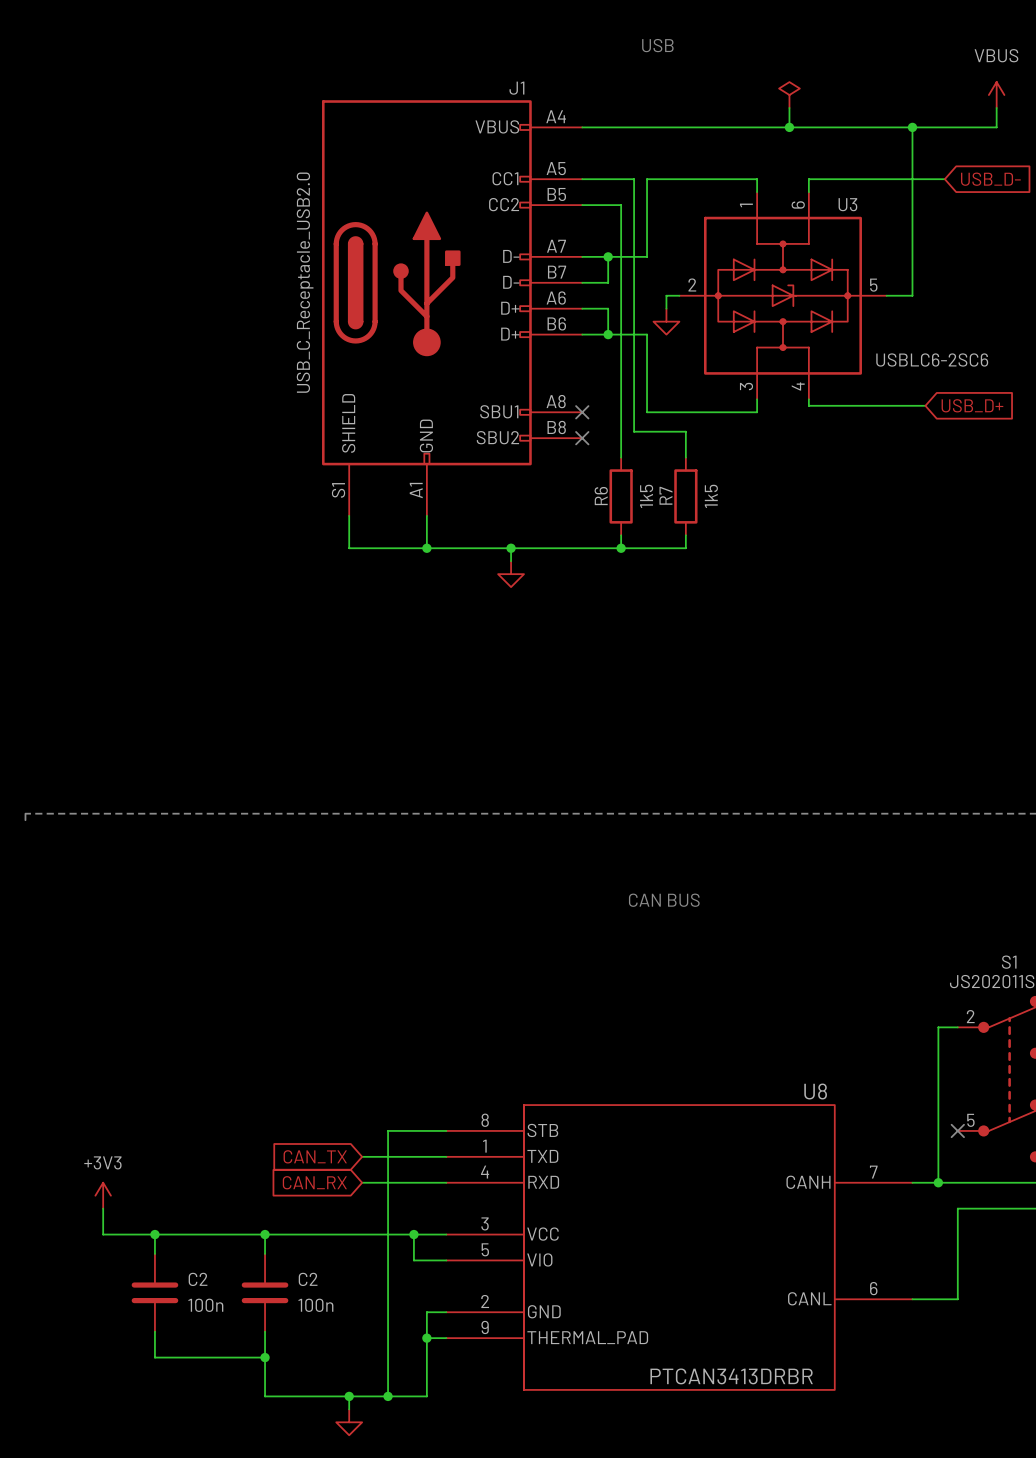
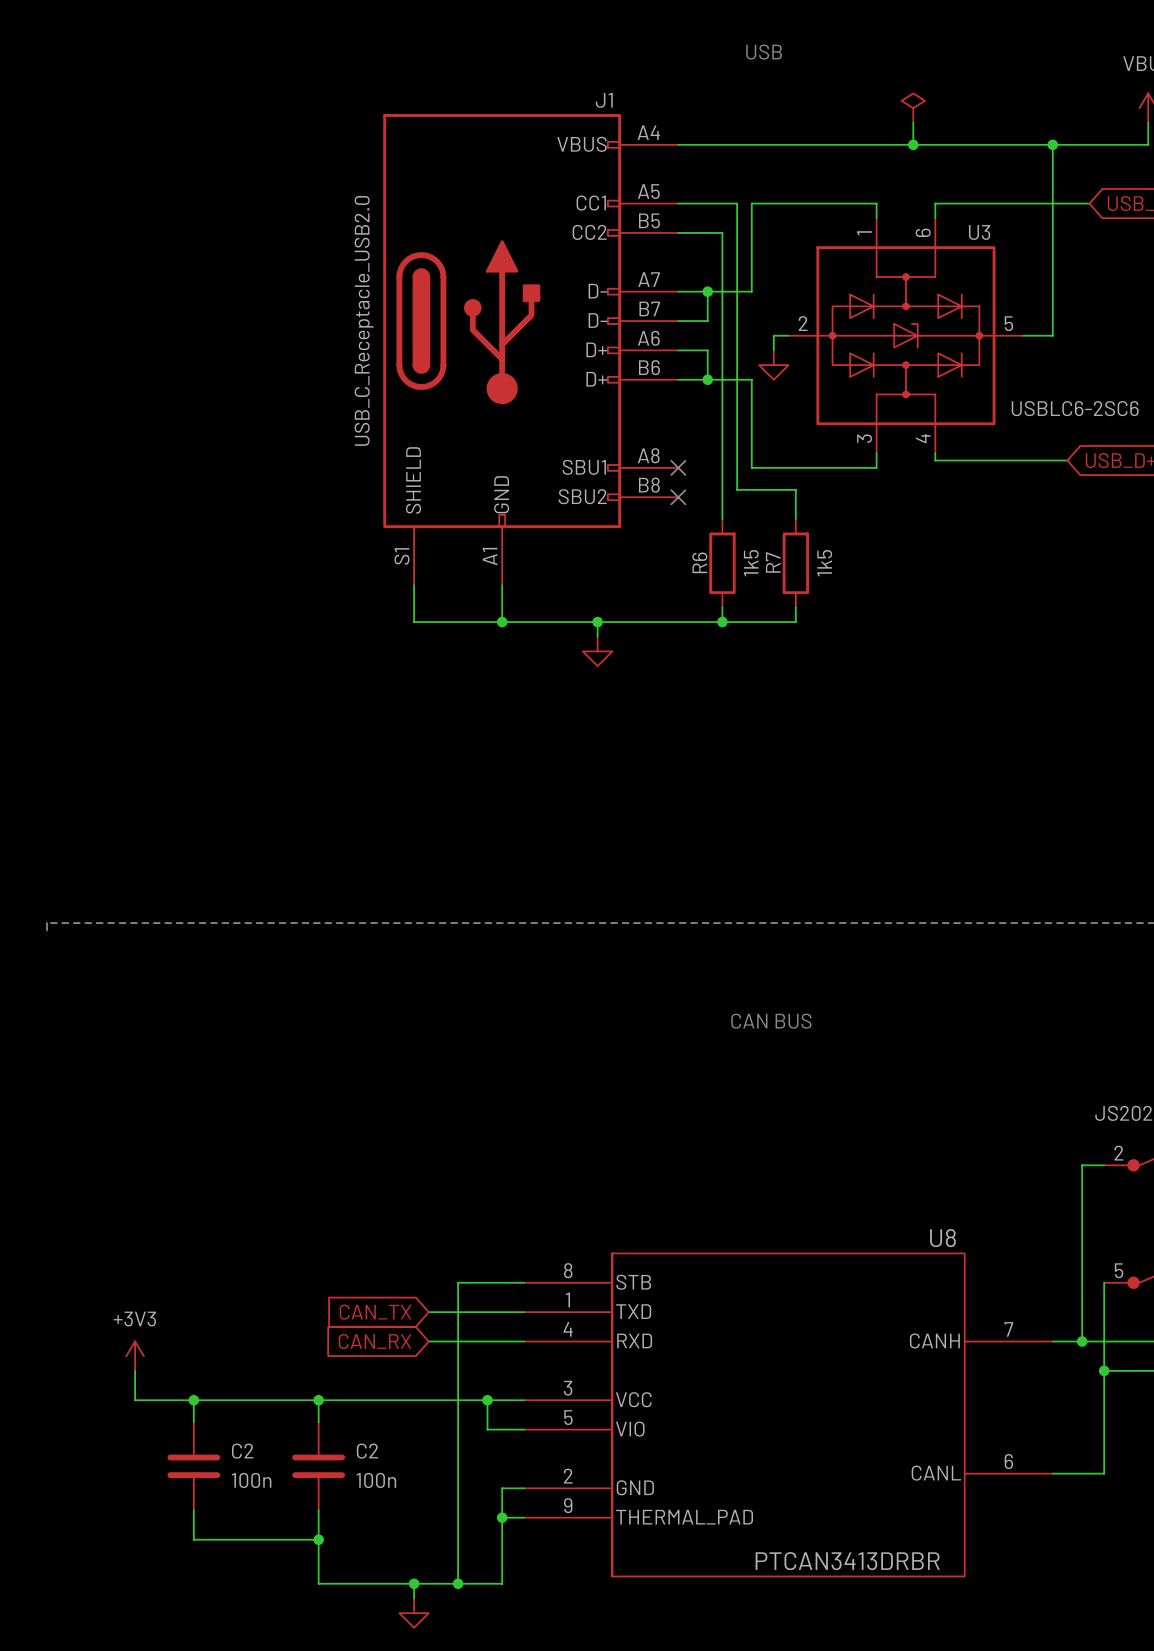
wire: none -> (1104, 1282) (1104, 1370)
no-connect mark: (957, 1130) -> none
junction: none -> (1104, 1370)

